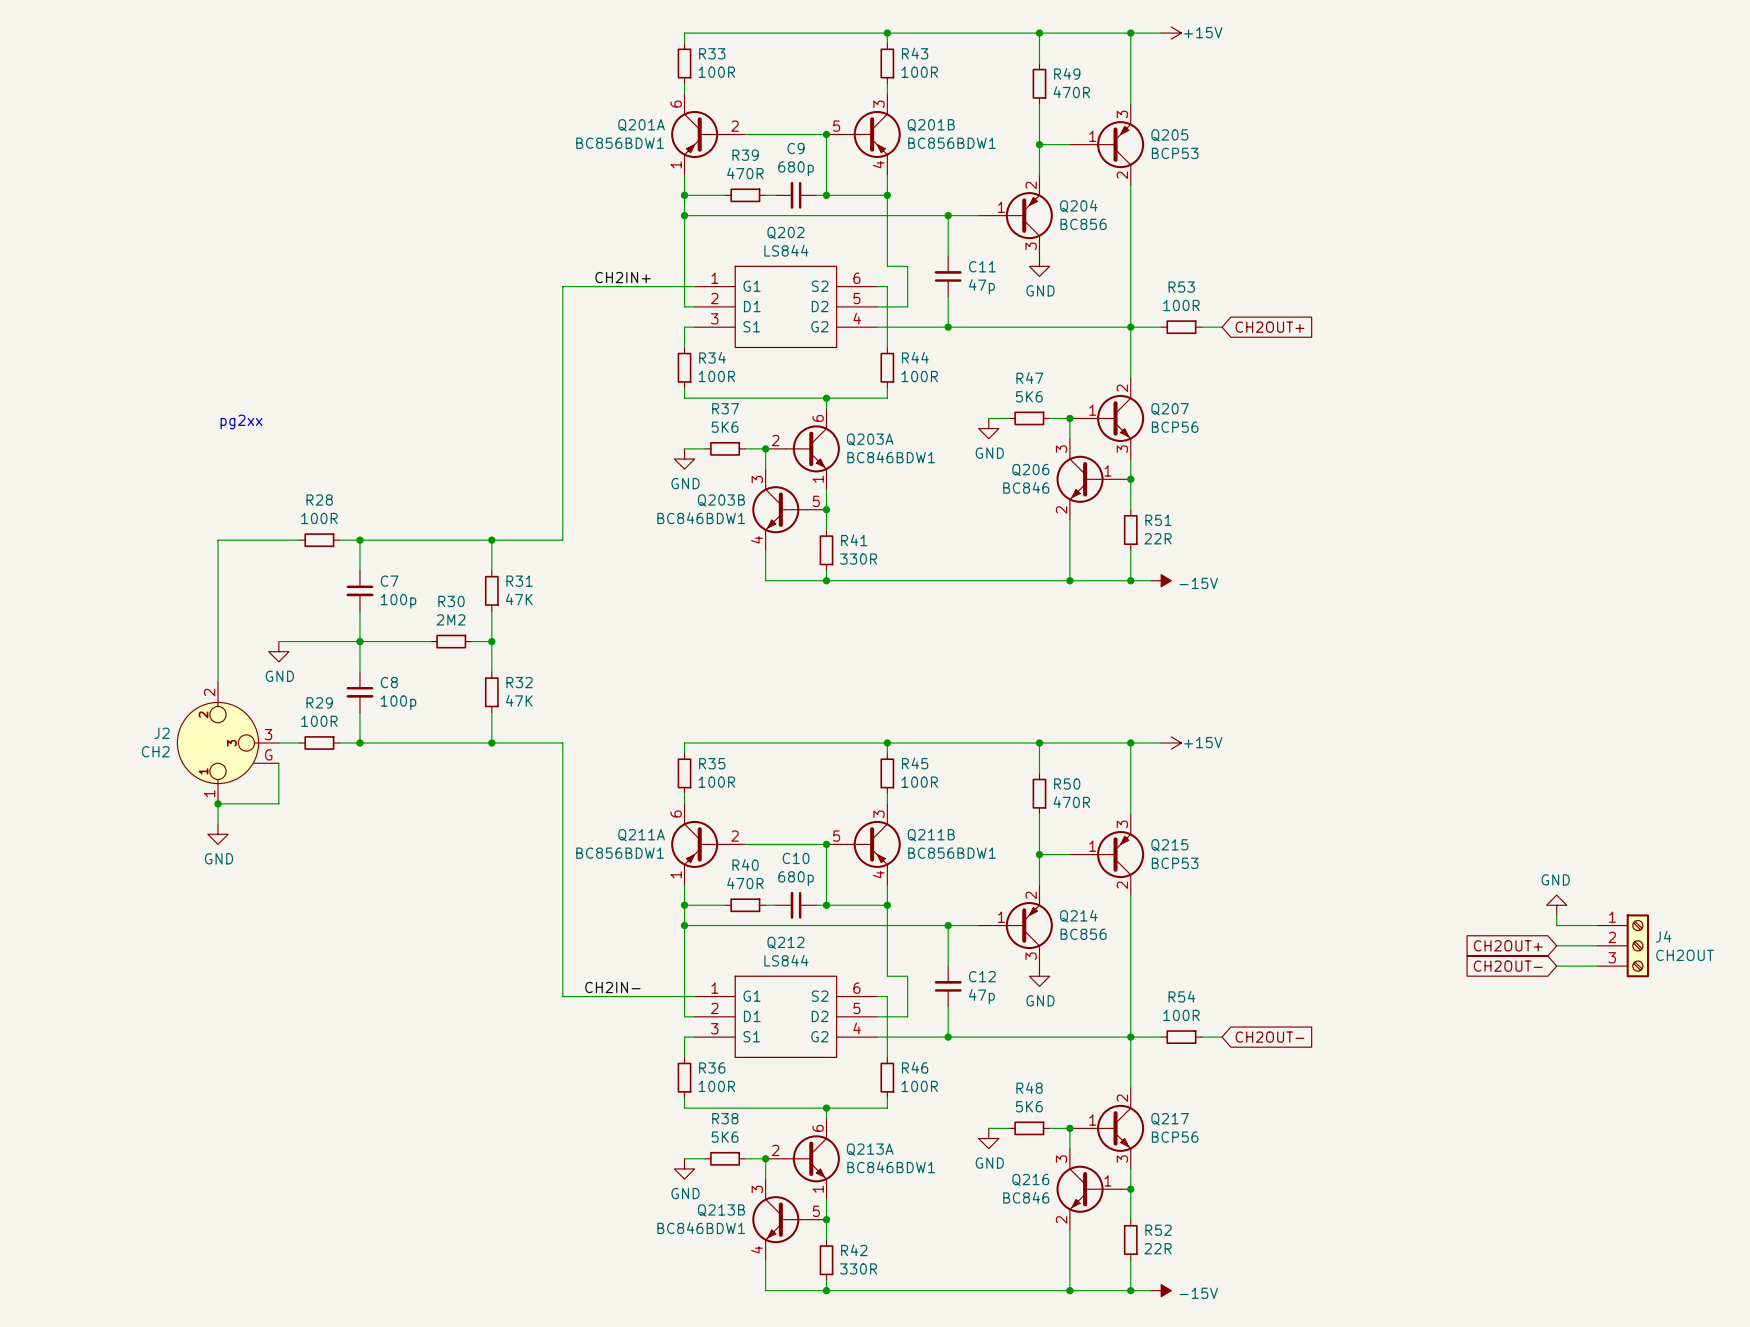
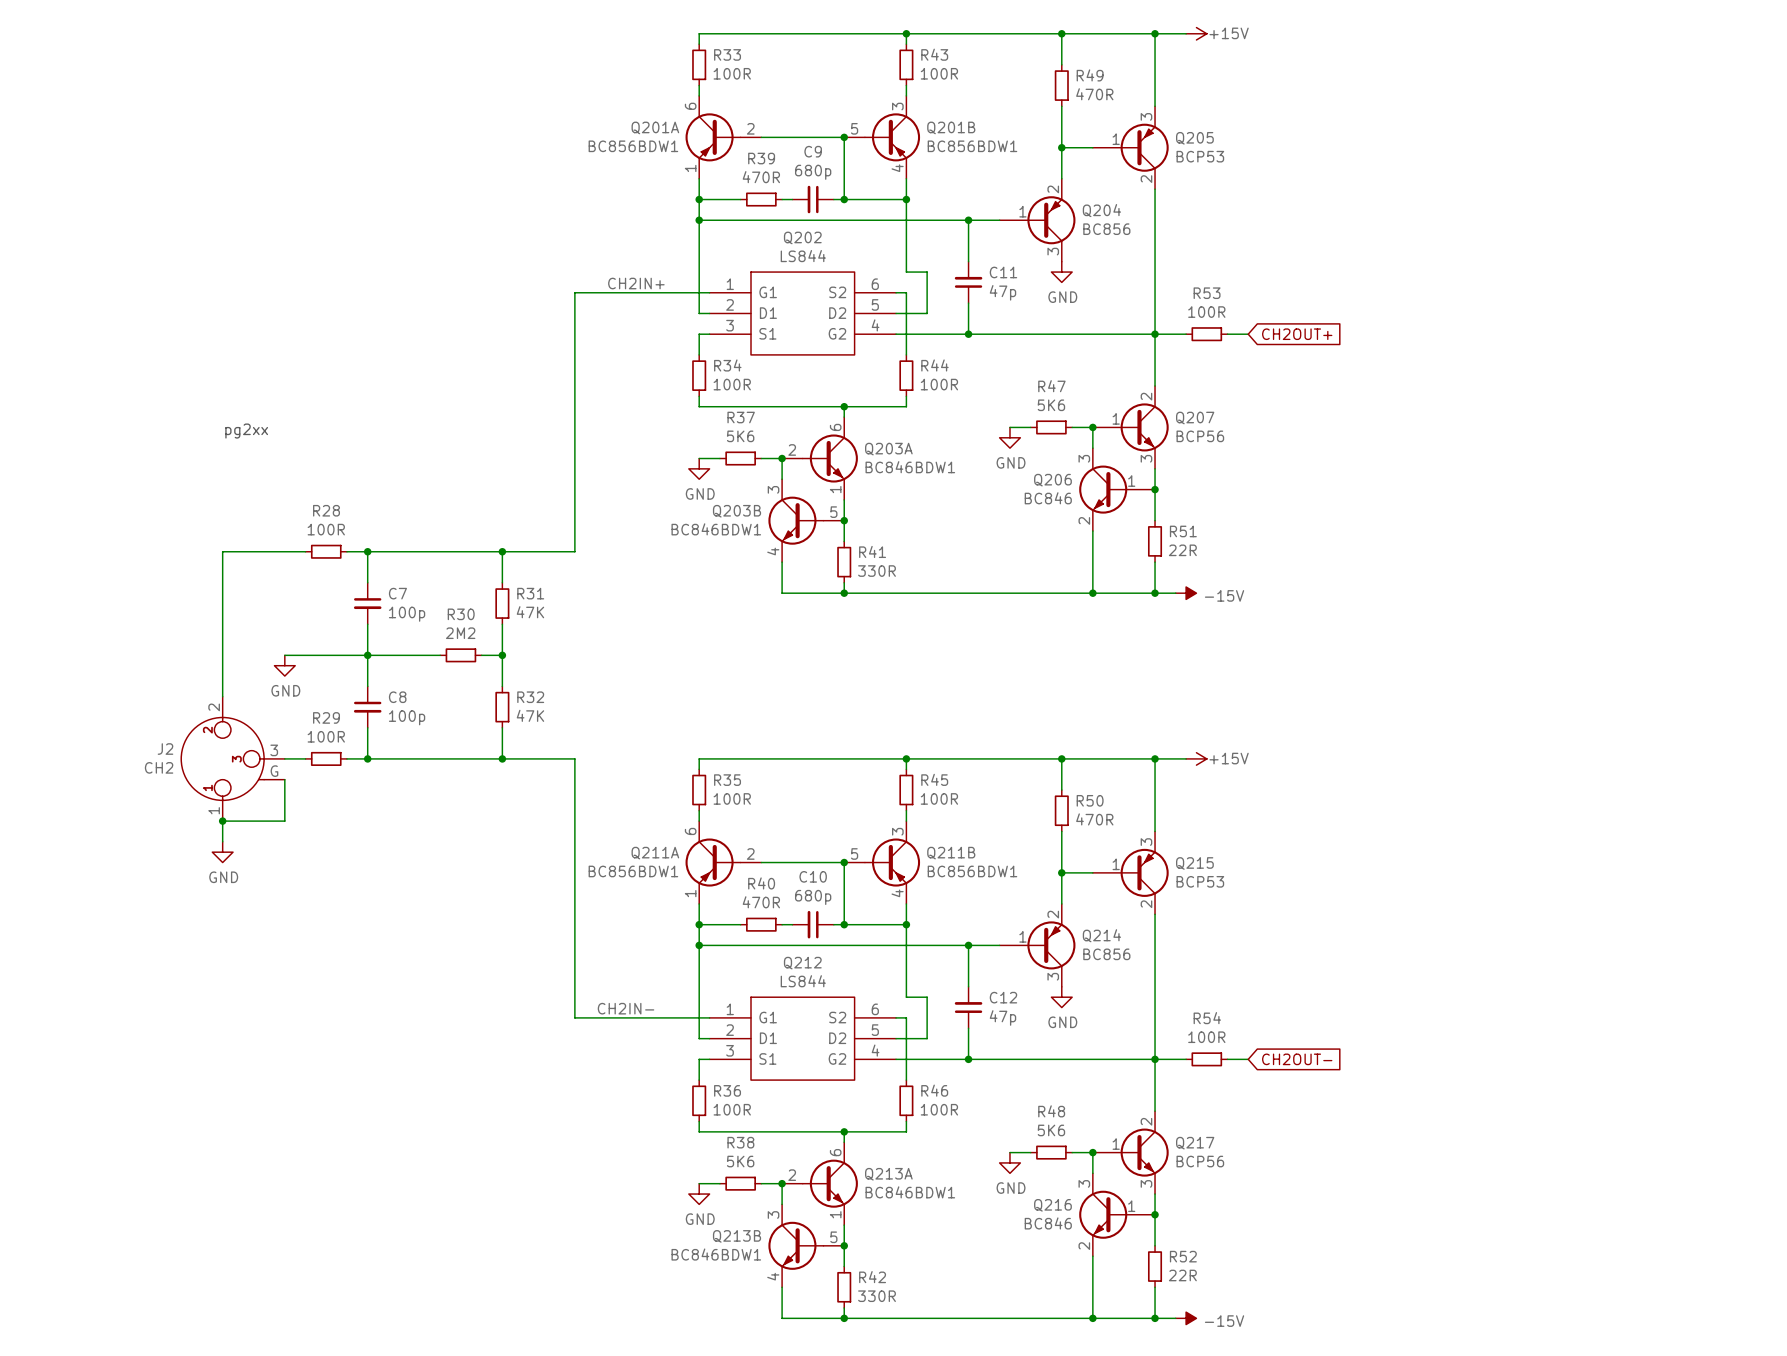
power symbol: GND (1556, 905) -> none
wire: (1556, 915) (1556, 925) (1597, 925) -> none
global label: CH2OUT+ (1508, 945) -> none
wire: (1556, 945) (1597, 945) -> none
J4: CH2OUT (1623, 945) -> none
global label: CH2OUT- (1508, 966) -> none
wire: (1556, 966) (1597, 966) -> none

